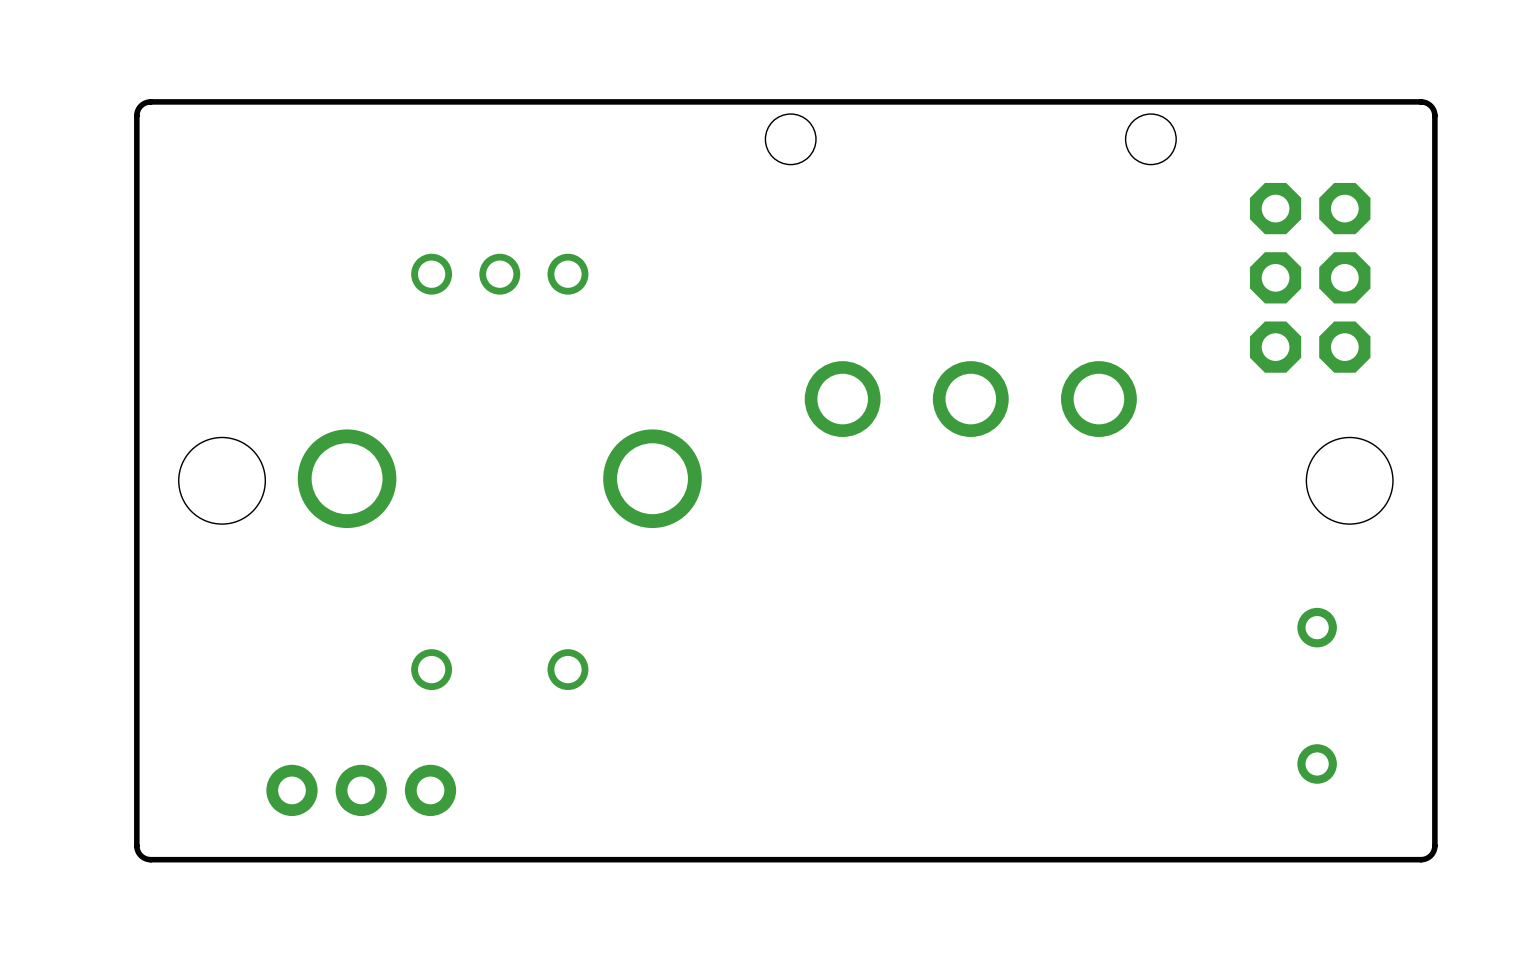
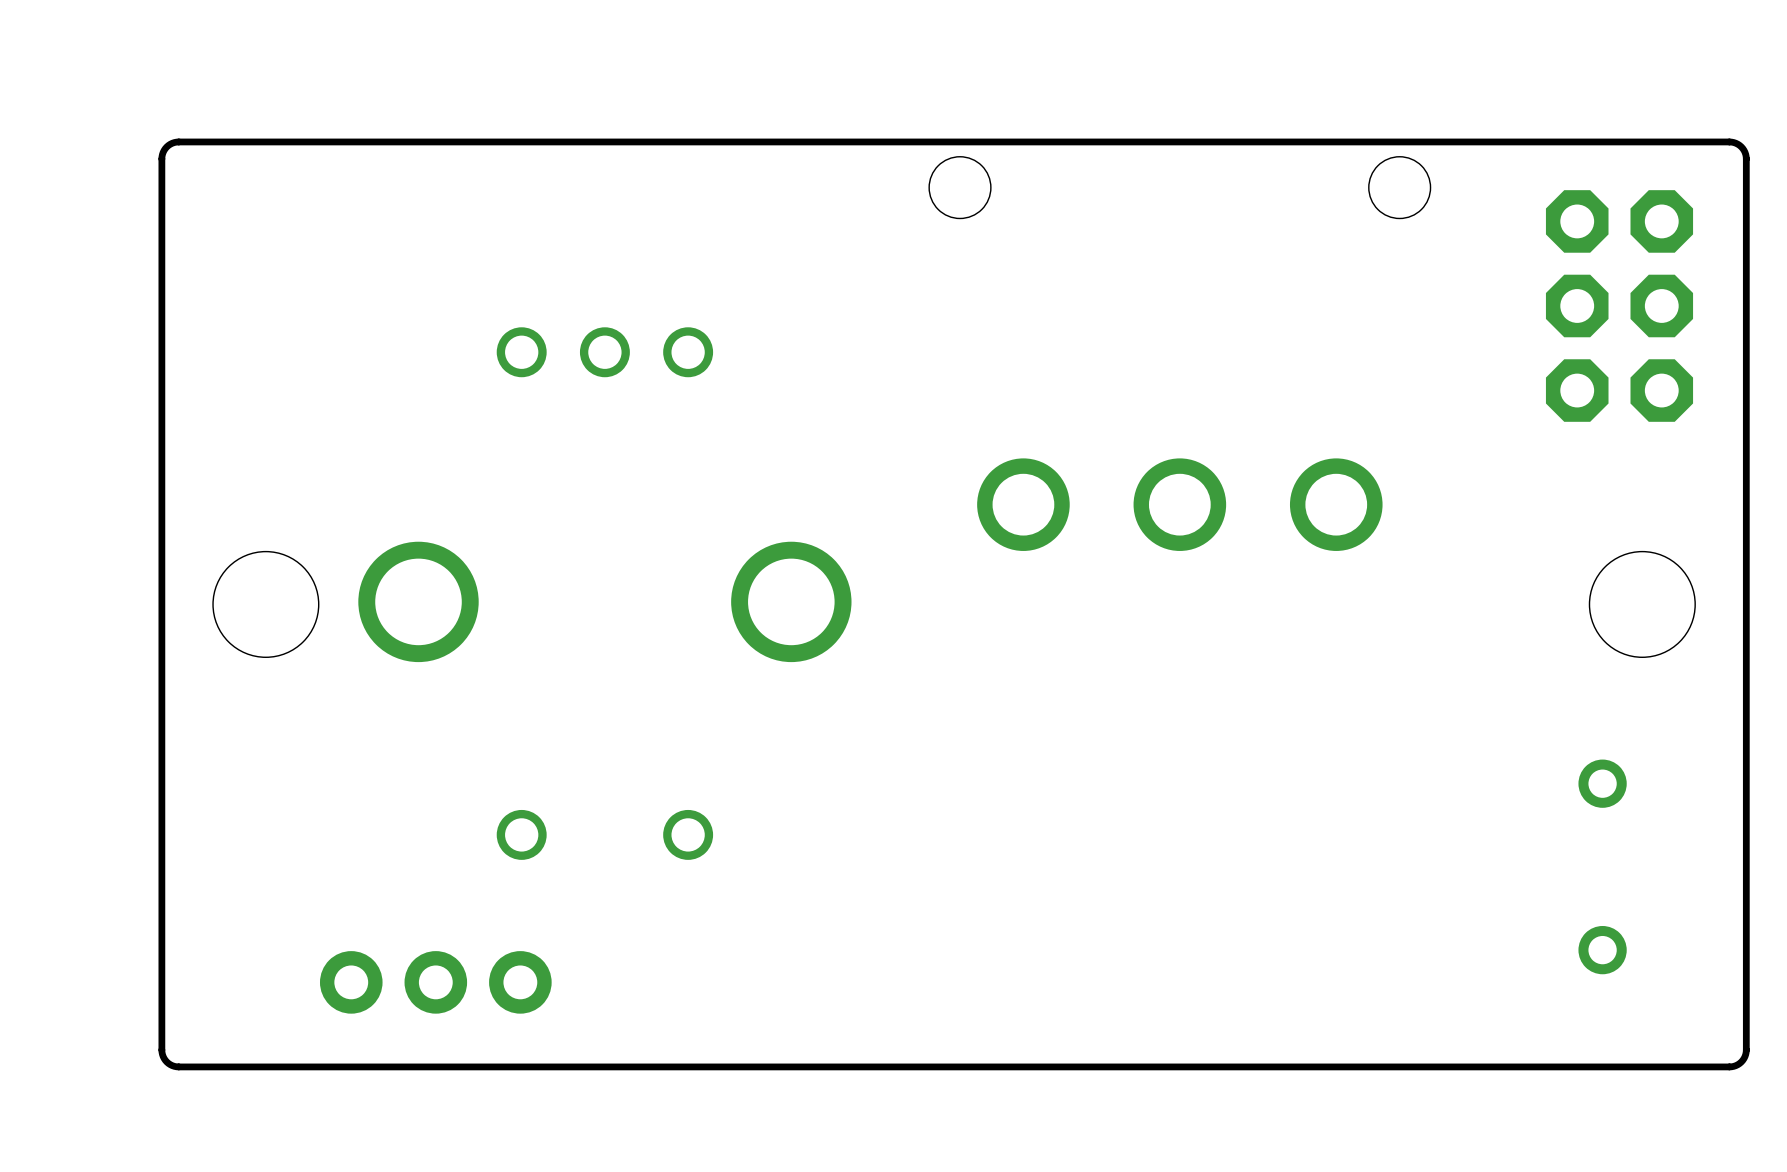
part position: (1310, 277) -> (1619, 305)

